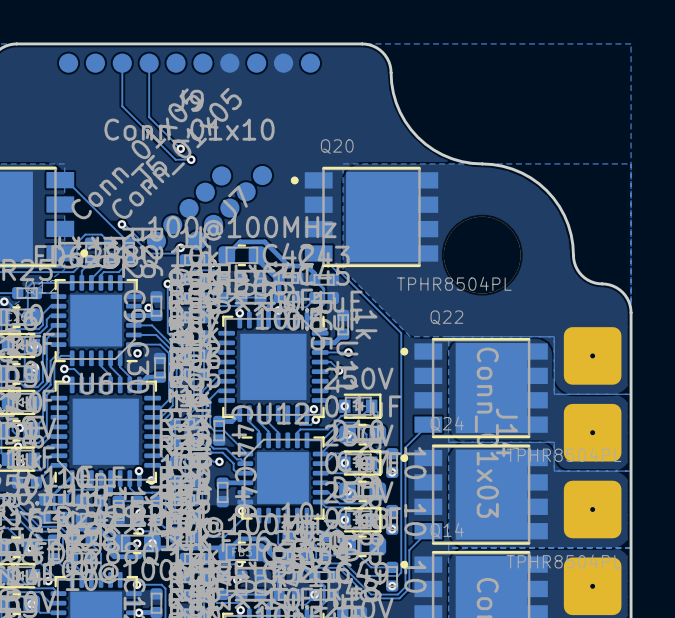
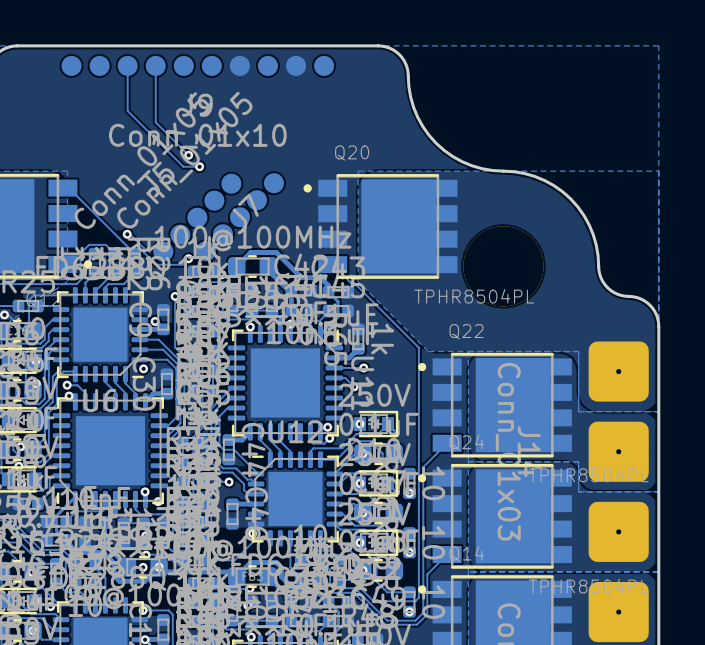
via: (314, 594) -> none

